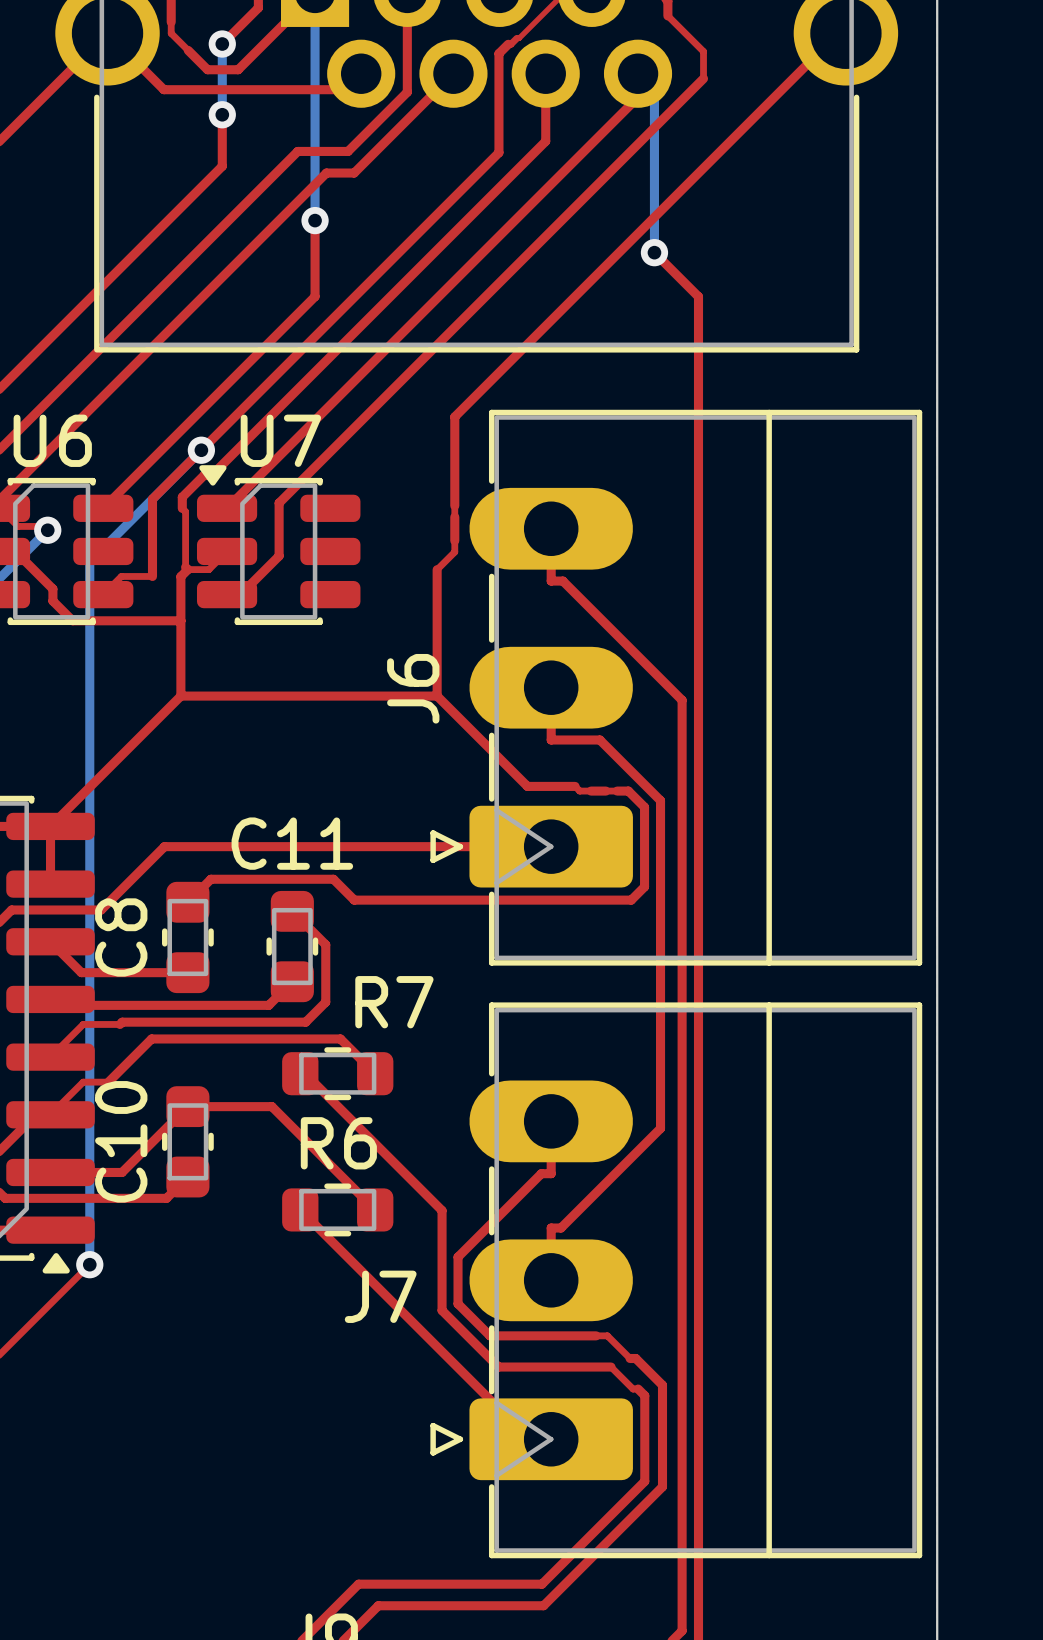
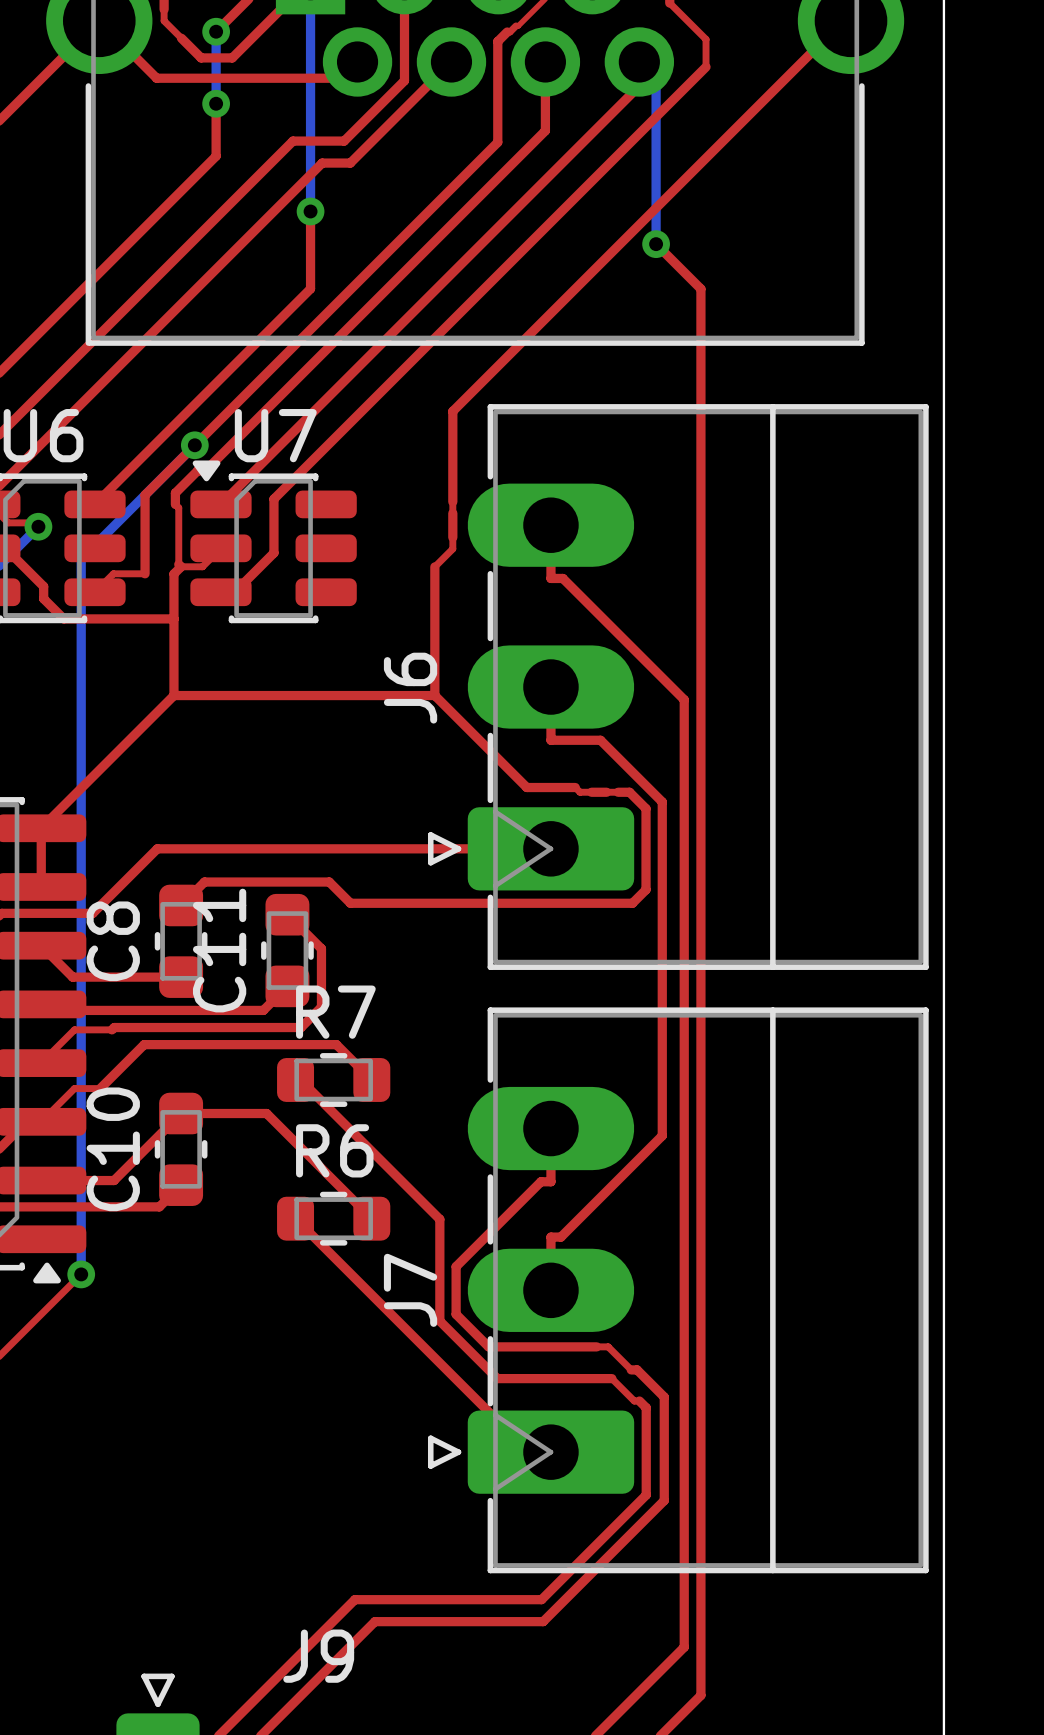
C11 name rotation: 0° (292, 843) -> 90° counterclockwise (219, 950)
R7 name position: R7 (394, 1002) -> R7 (335, 1012)
J7 name rotation: 0° (380, 1296) -> 90° counterclockwise (410, 1290)

